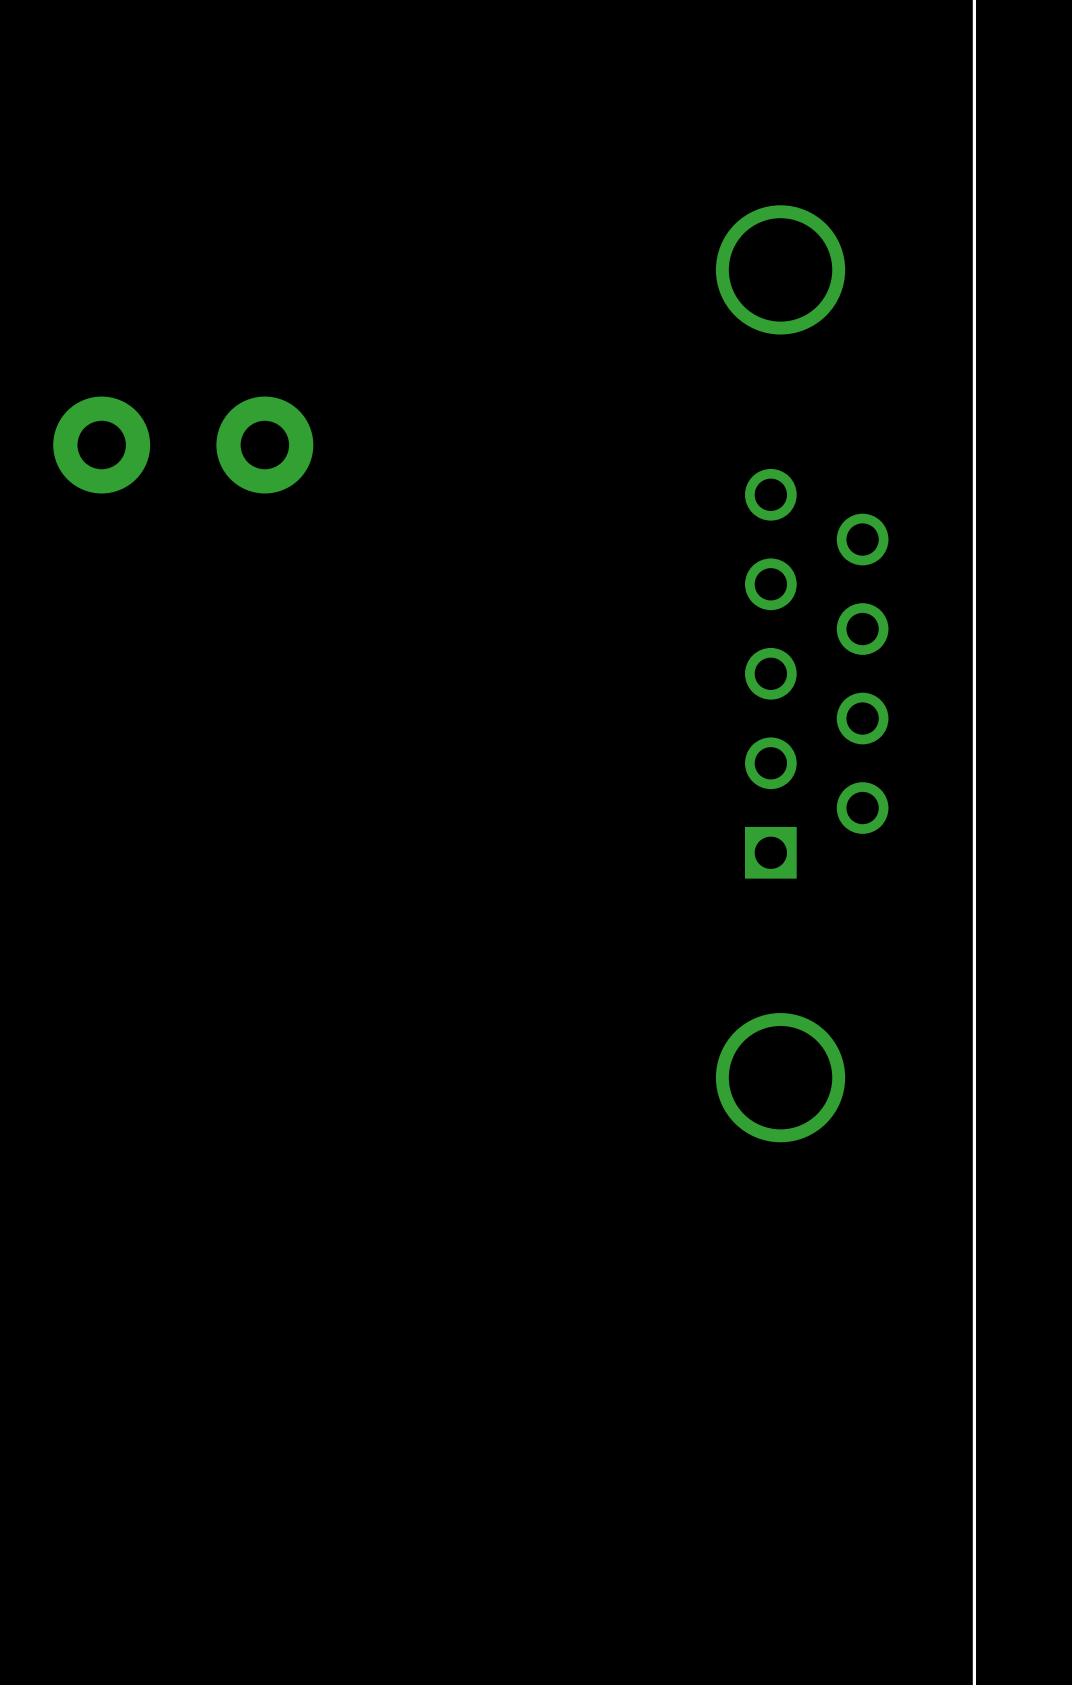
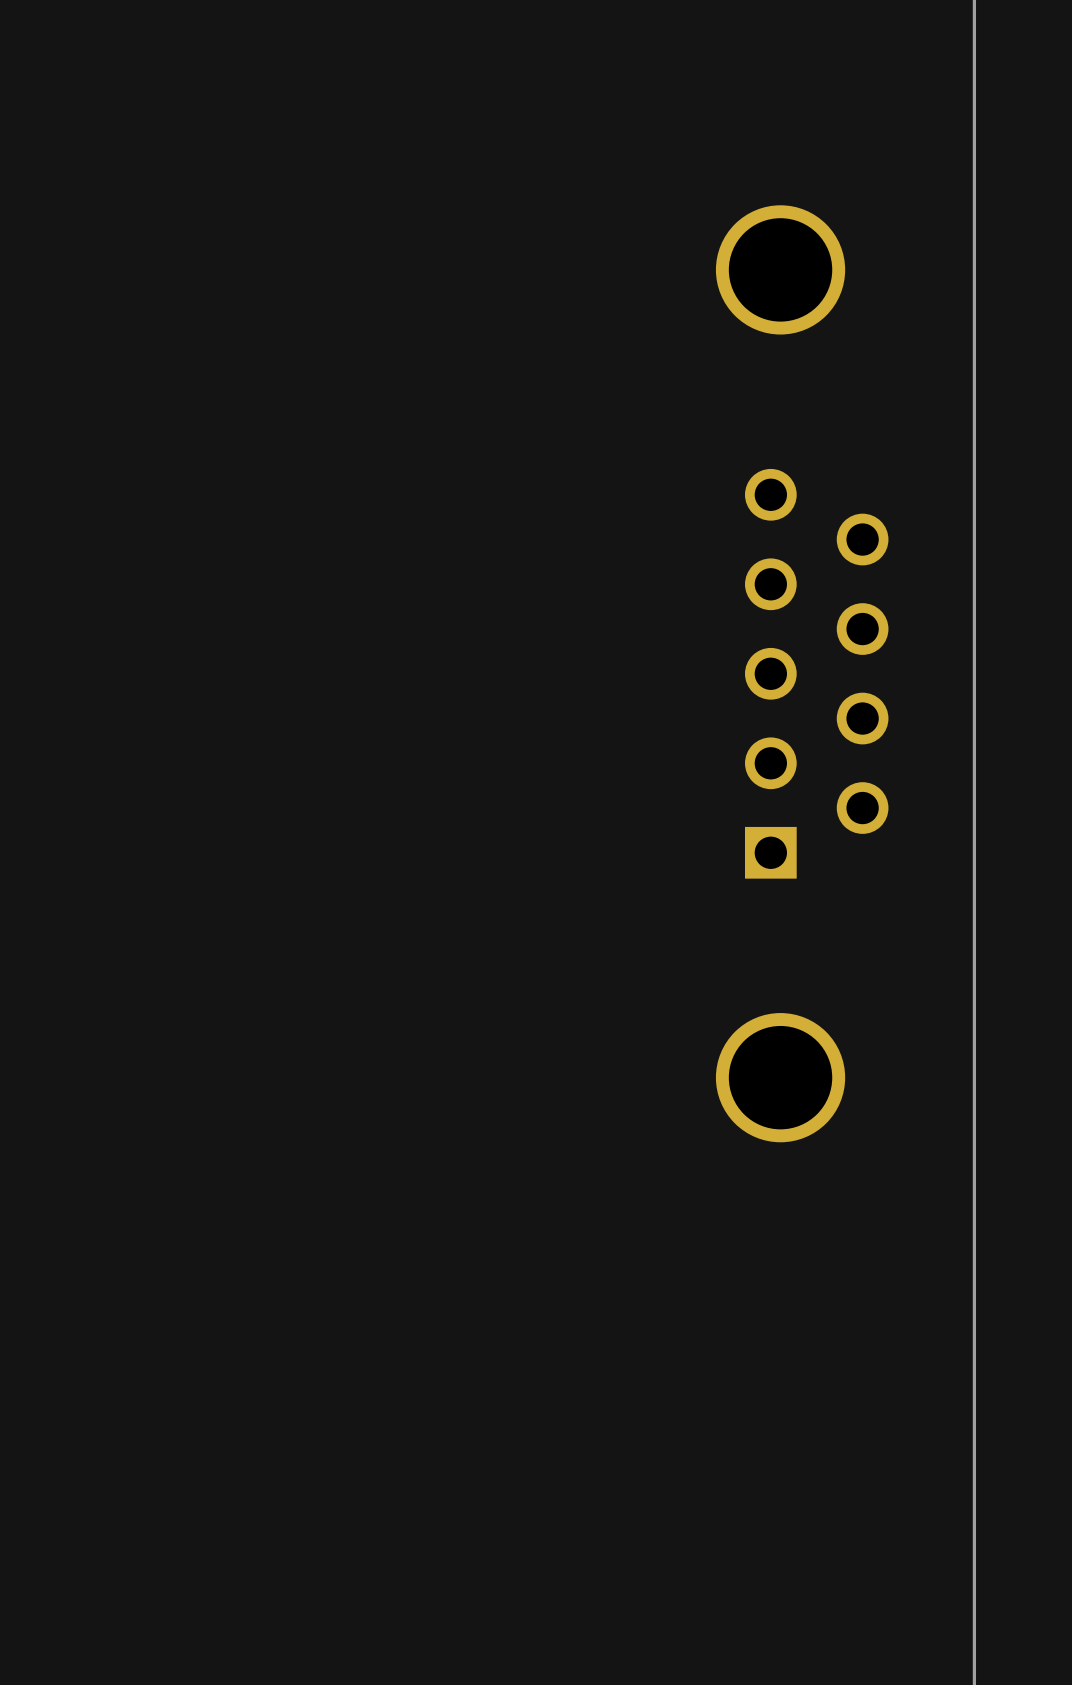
part: (101, 445) -> none
part: (264, 445) -> none

